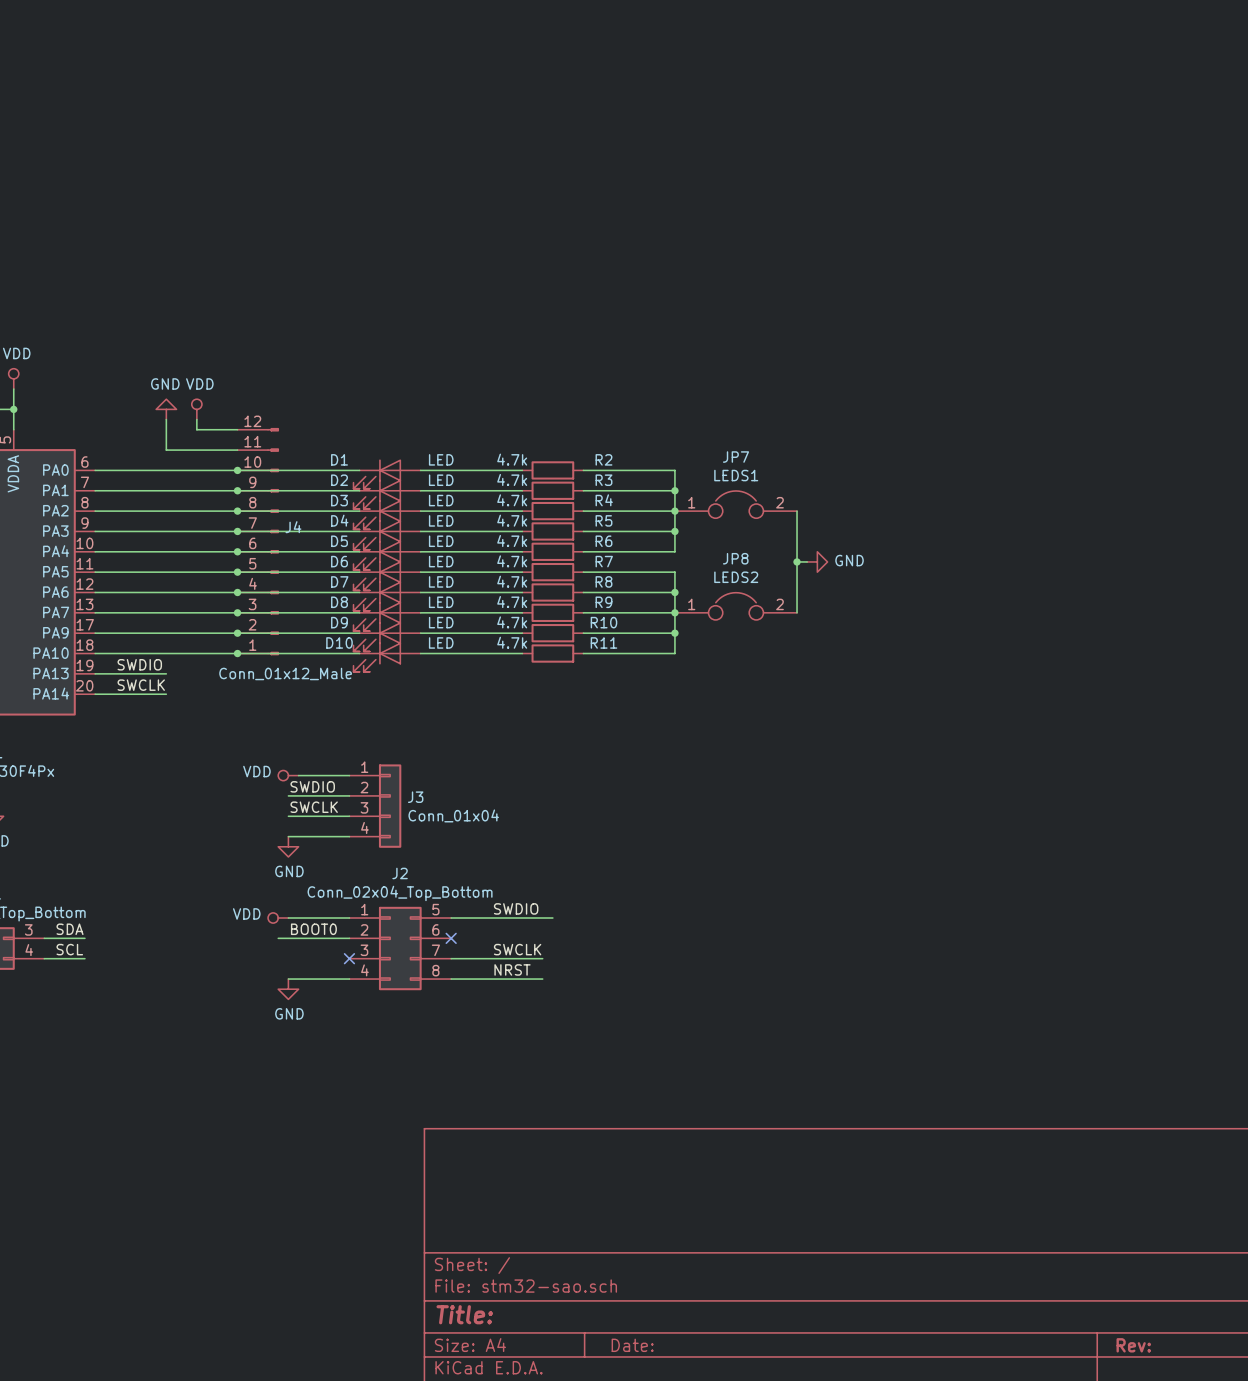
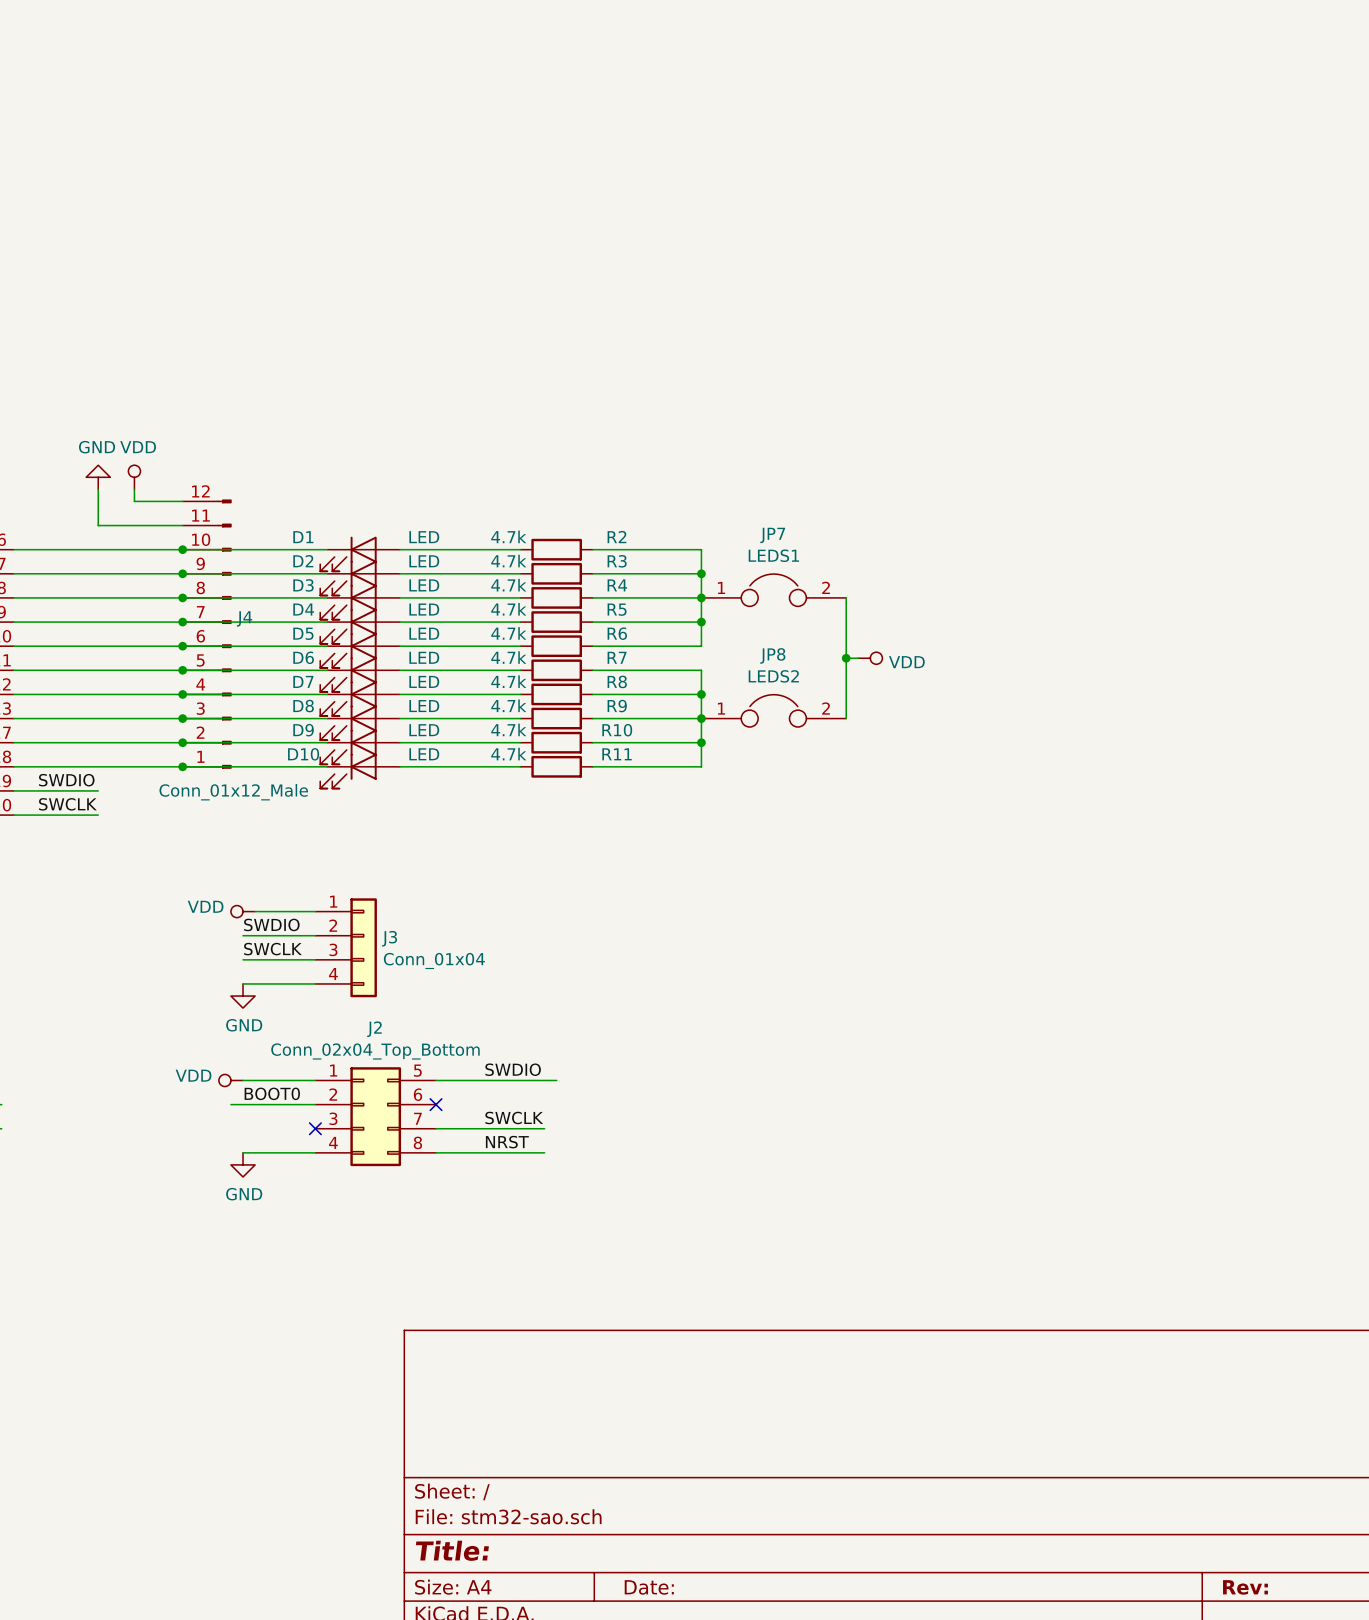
power symbol: GND (817, 561) -> VDD (870, 658)

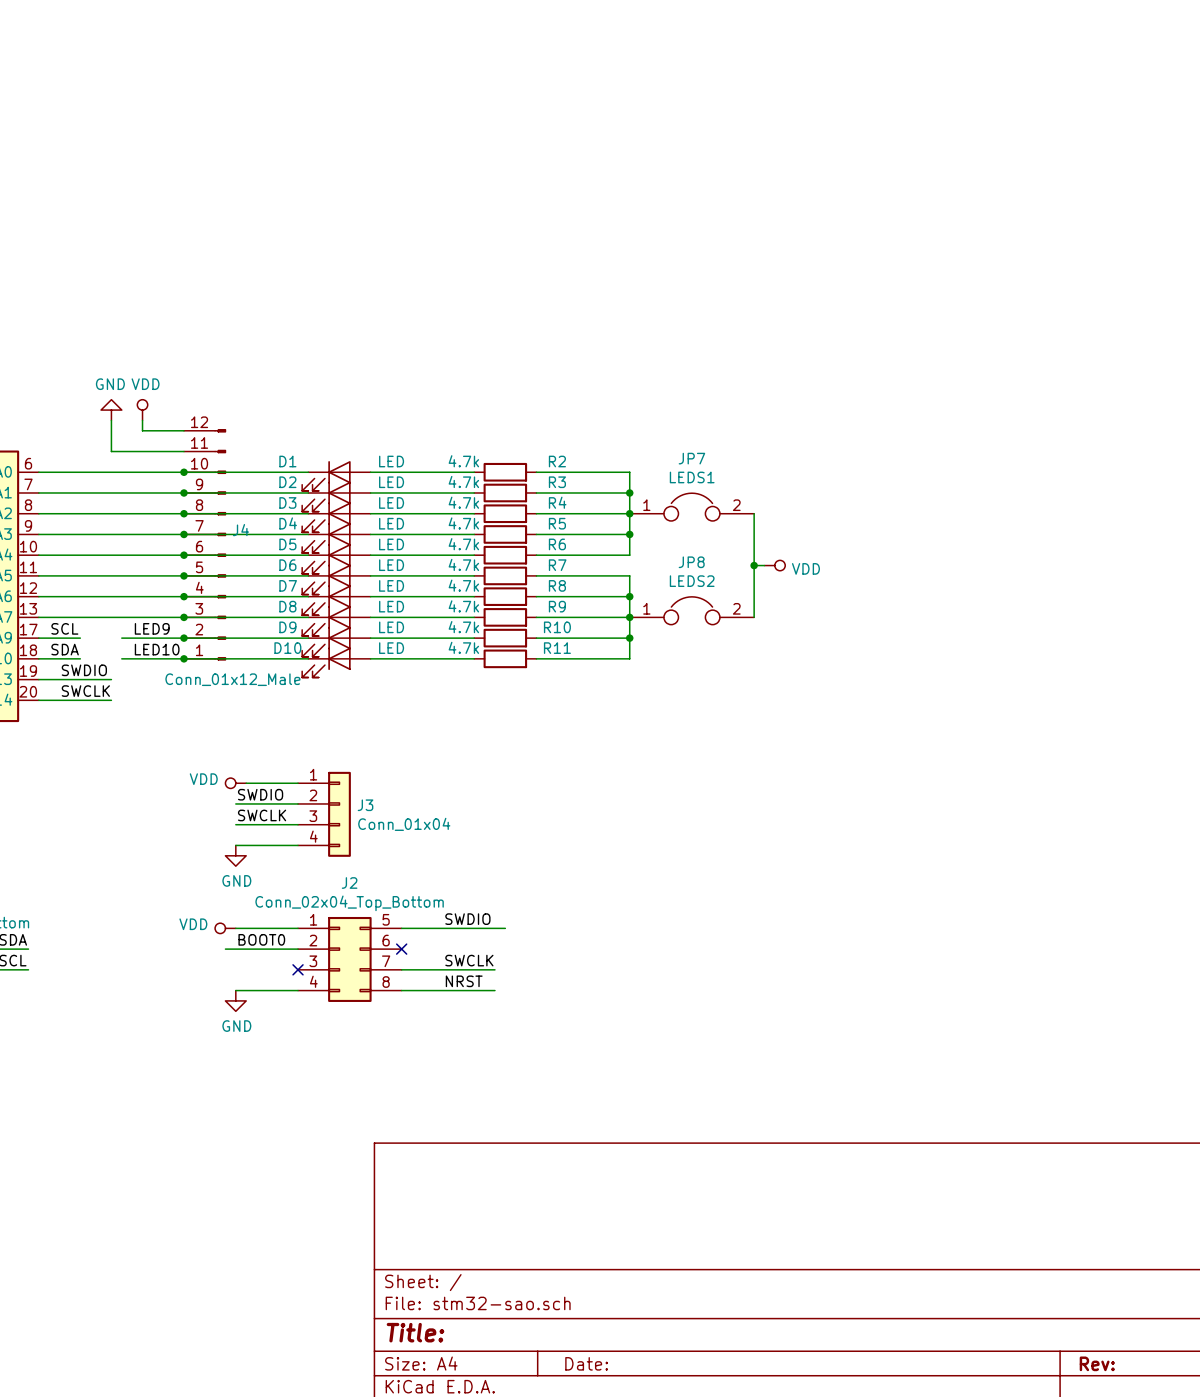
label: none -> SCL (64, 628)
label: none -> LED9 (152, 628)
wire: (62, 742) (110, 742) -> none
label: none -> SDA (65, 649)
label: none -> LED10 (157, 649)
wire: (62, 766) (110, 766) -> none

